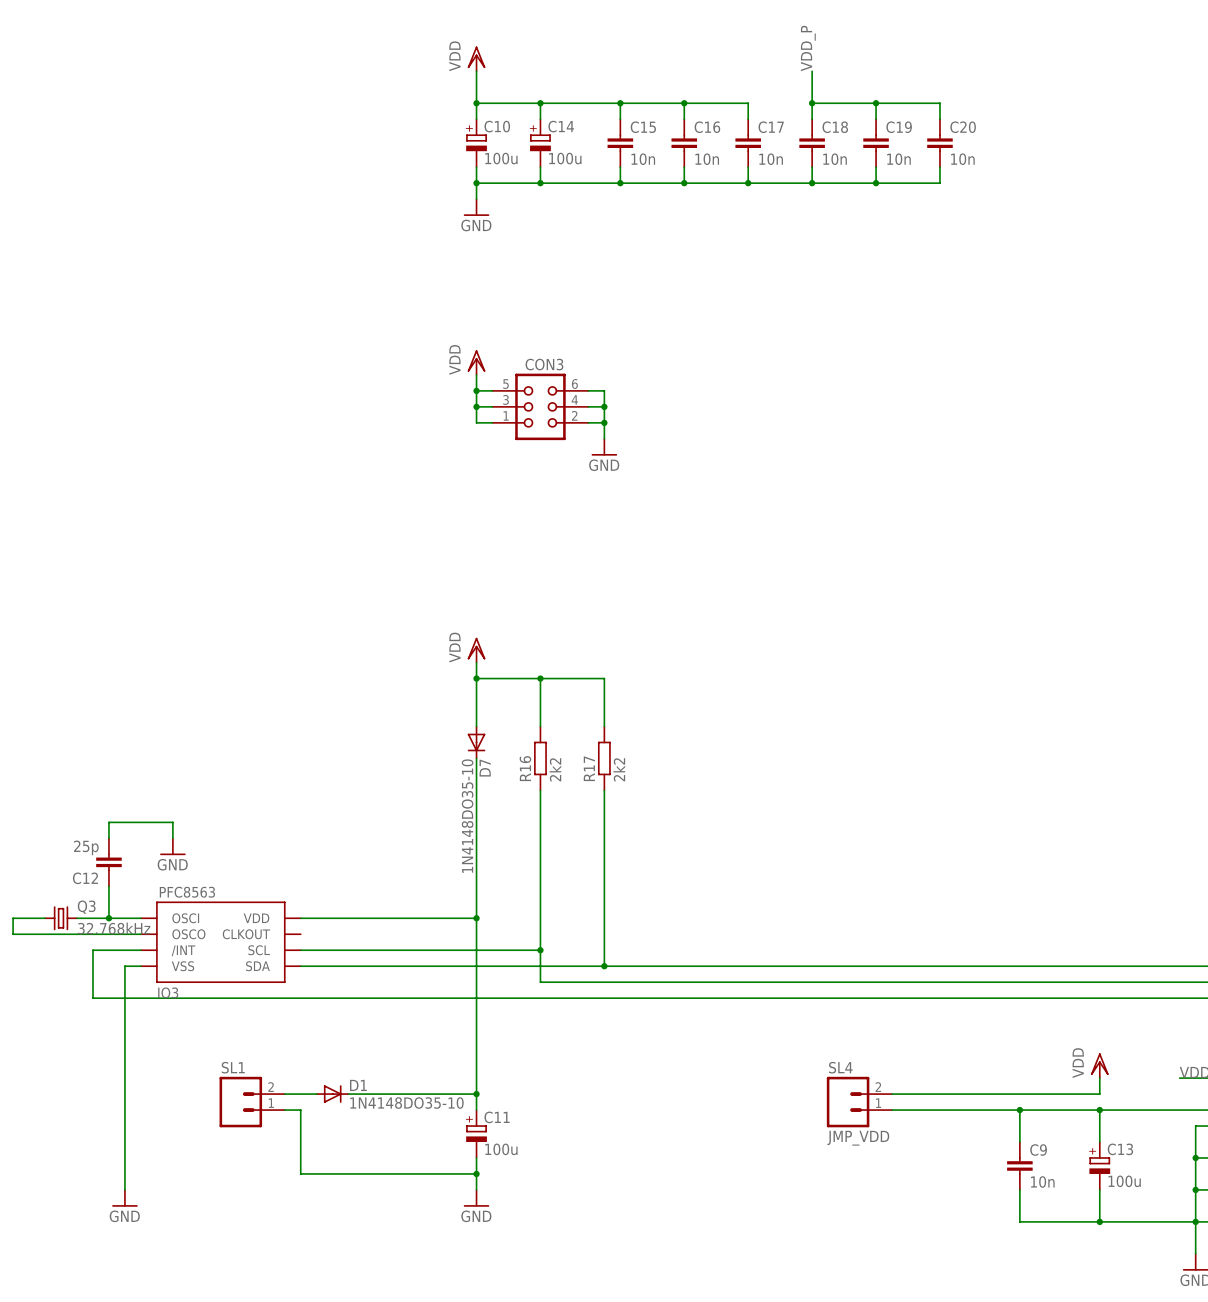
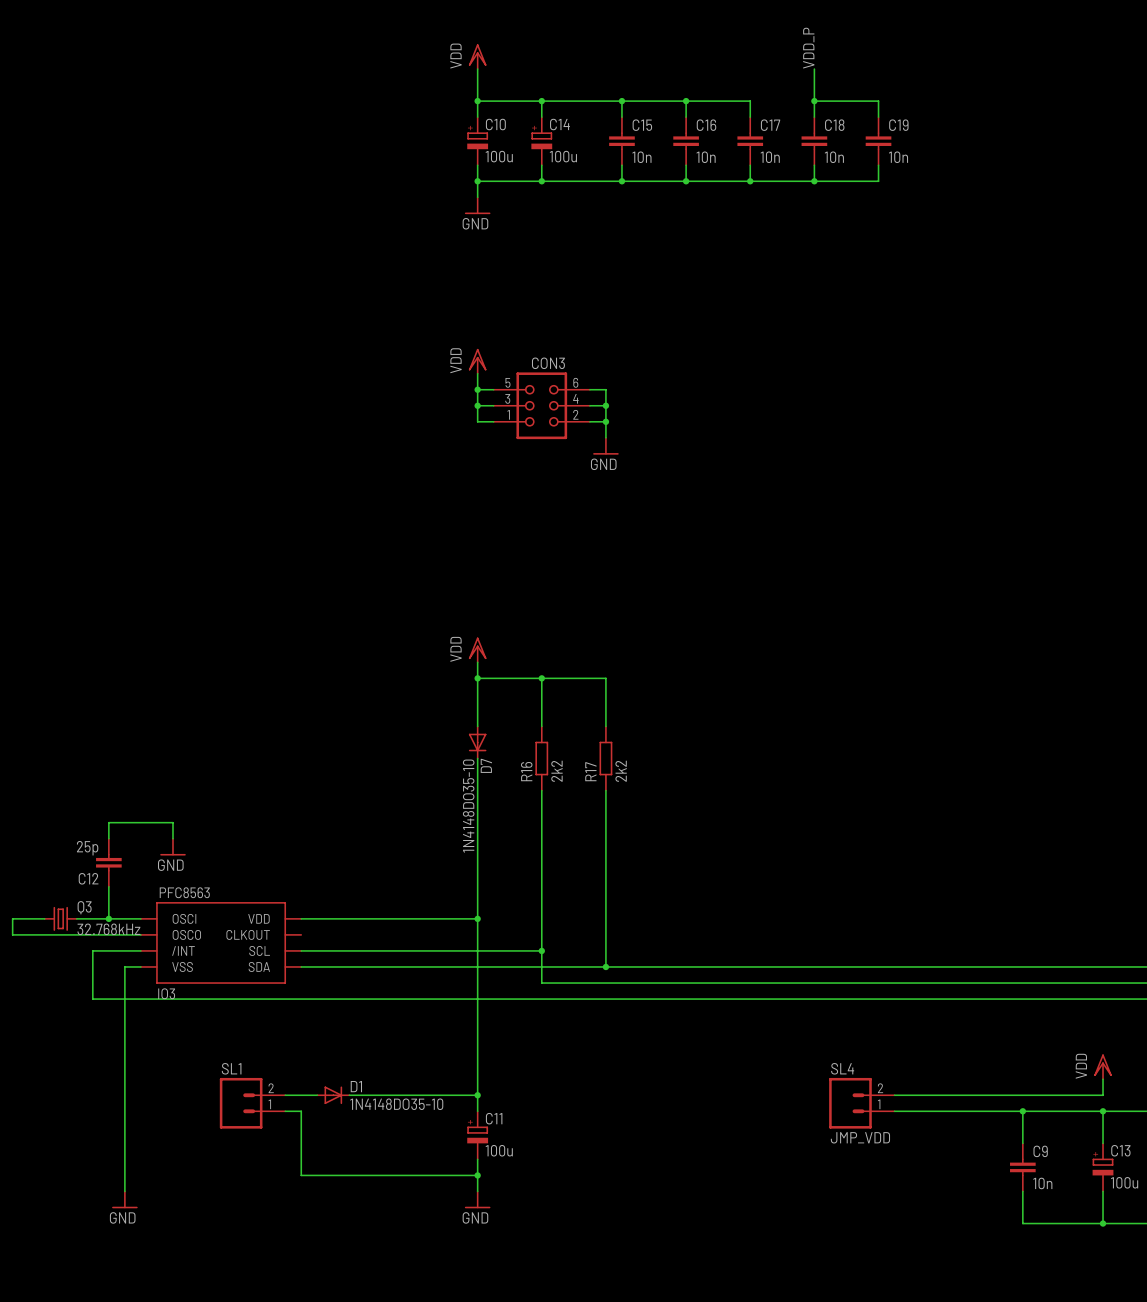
wire: (876, 103) (939, 103) (939, 119) -> none
junction: (876, 103) -> none
C20: 10n (939, 143) -> none
wire: (939, 167) (939, 183) (876, 183) -> none
junction: (876, 183) -> none

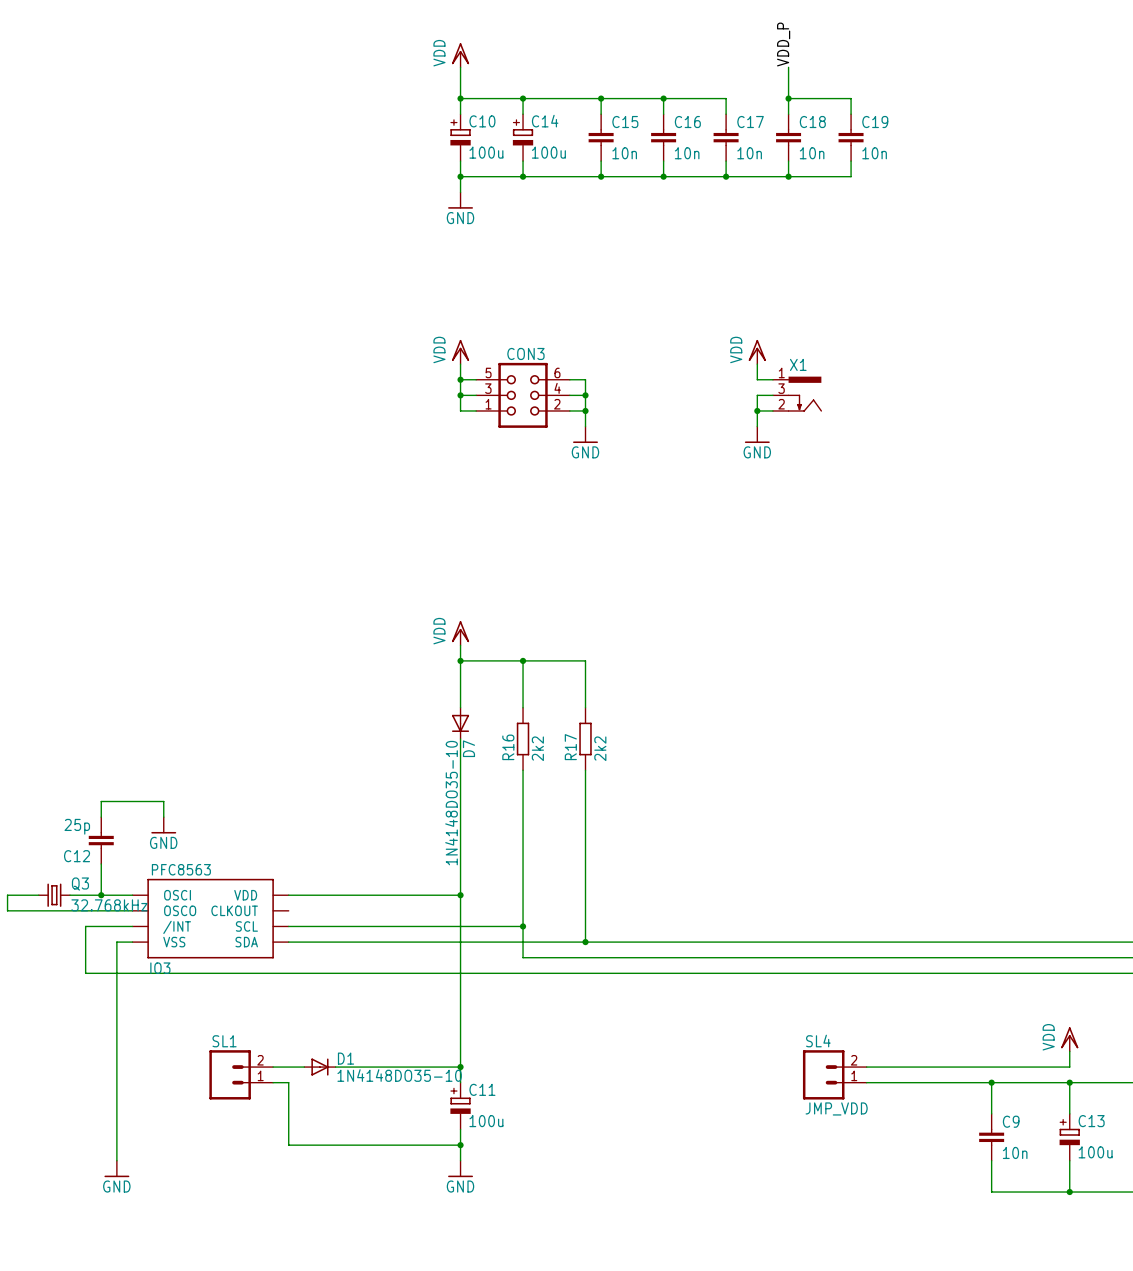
power symbol: none -> VDD (757, 352)
wire: none -> (757, 364) (757, 379) (772, 379)
X1: none -> (797, 394)
wire: none -> (772, 395) (757, 395) (757, 426)
wire: none -> (757, 410) (772, 410)
junction: none -> (757, 410)
power symbol: none -> GND (757, 434)

